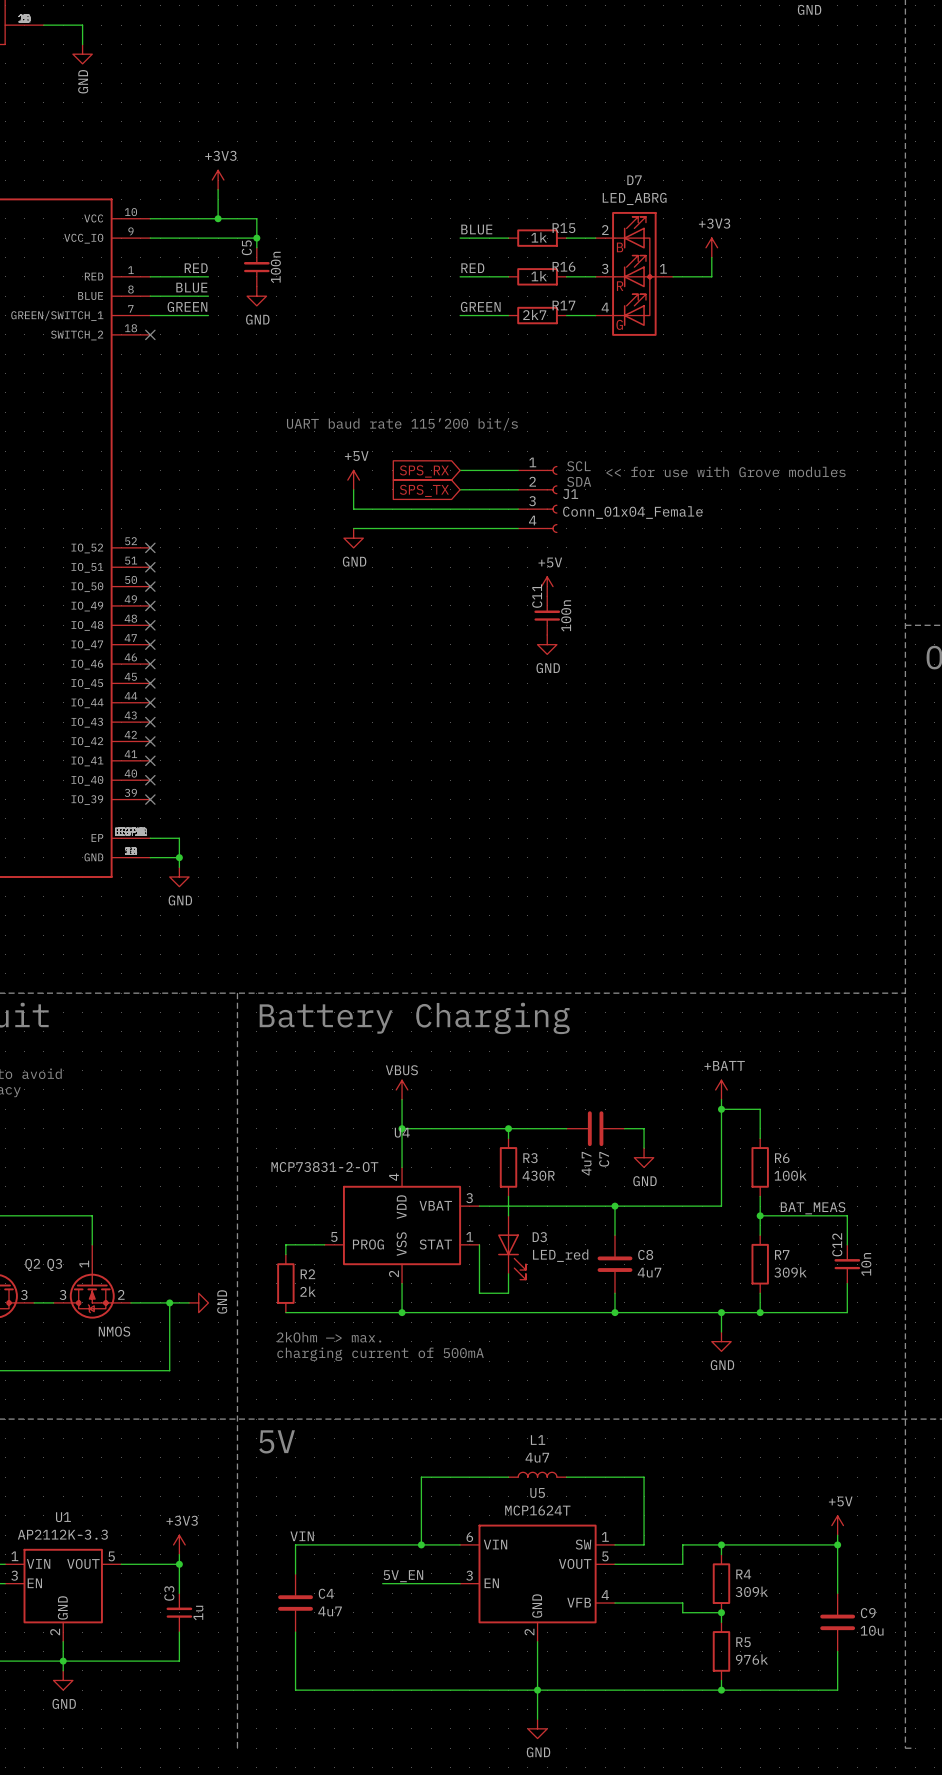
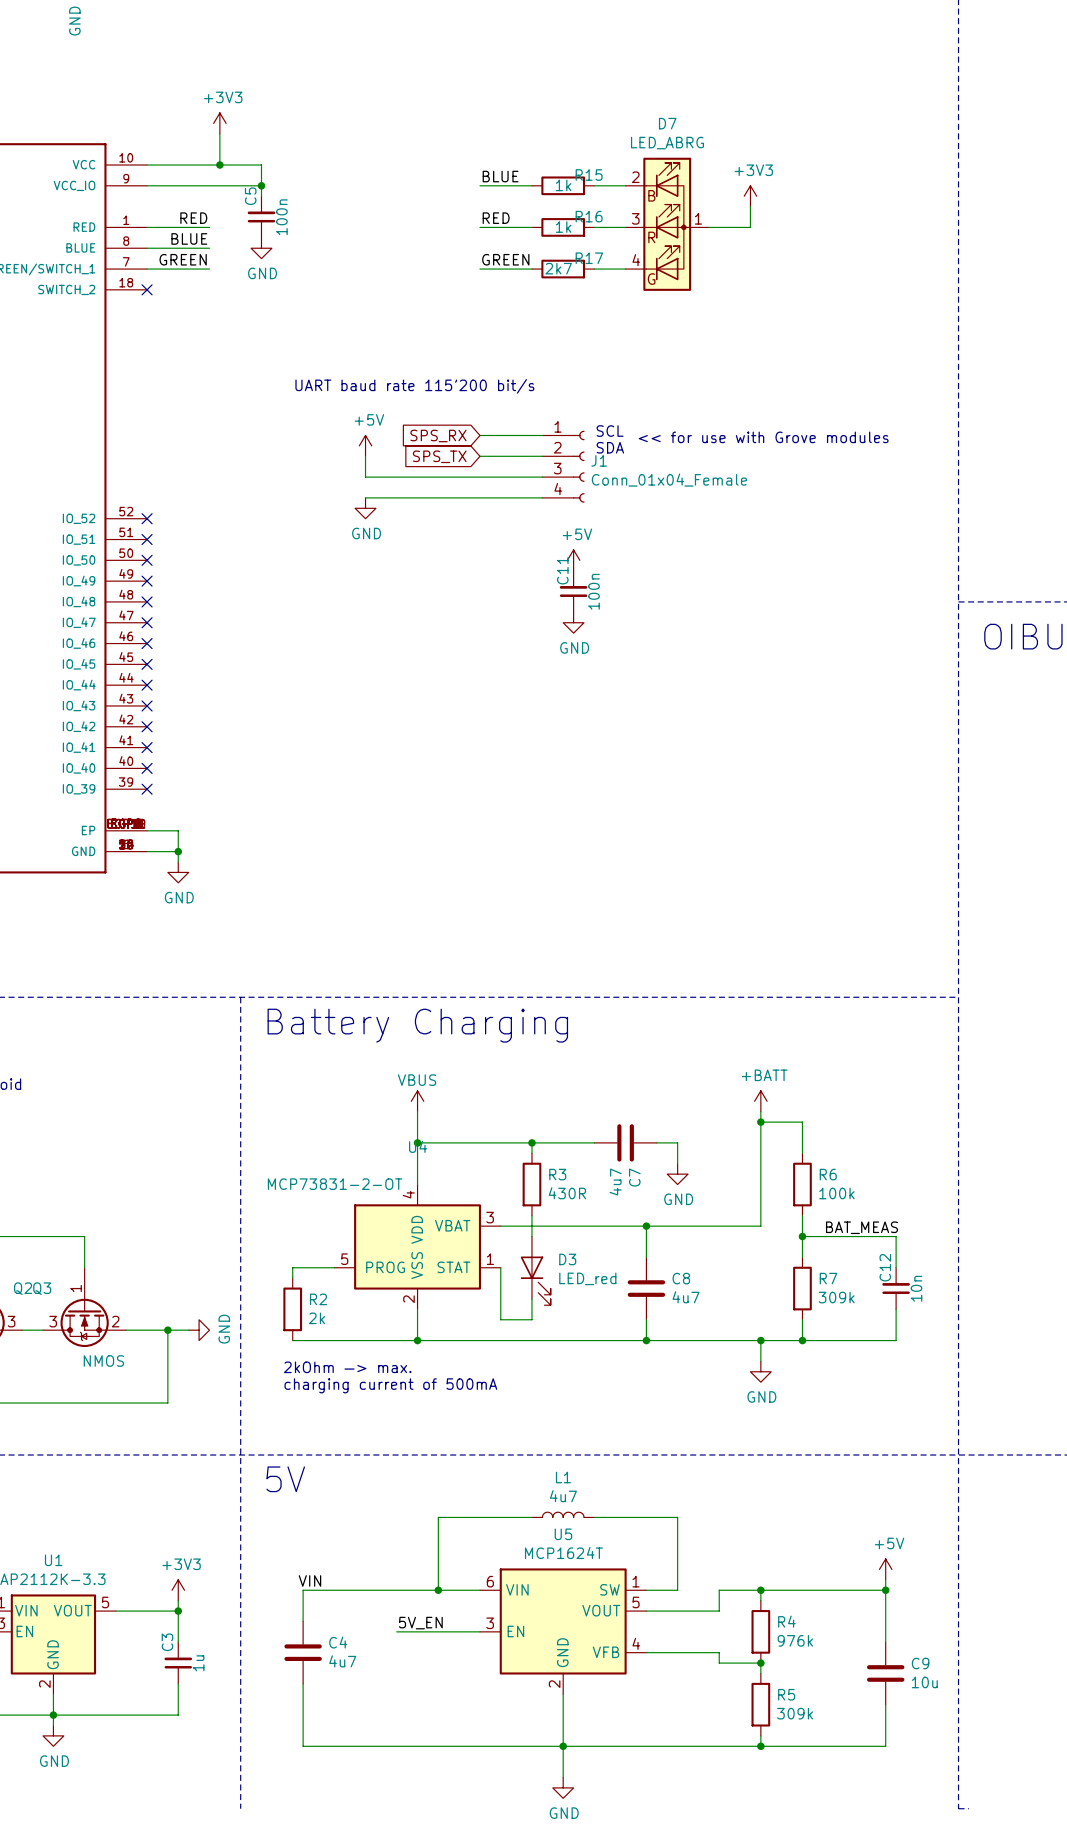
R4 value: 309k (751, 1591) -> 976k (795, 1640)
R5 value: 976k (751, 1659) -> 309k (795, 1713)

